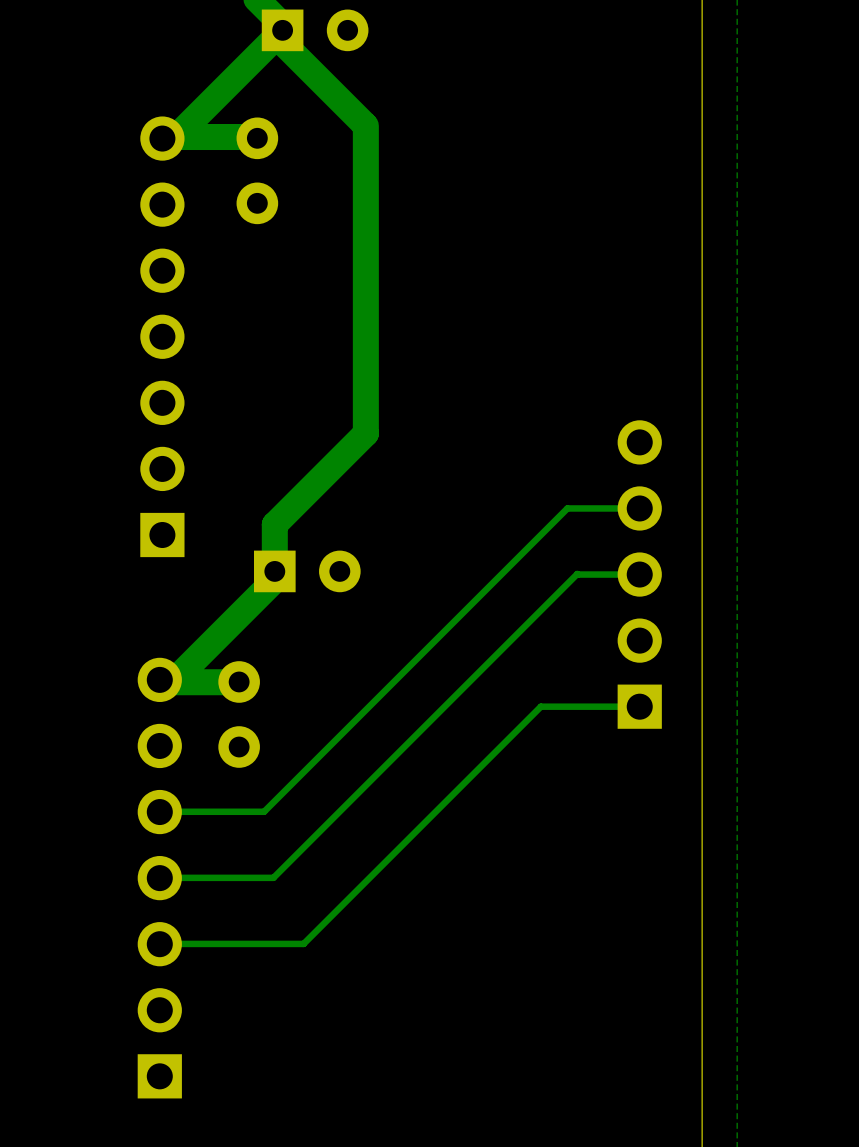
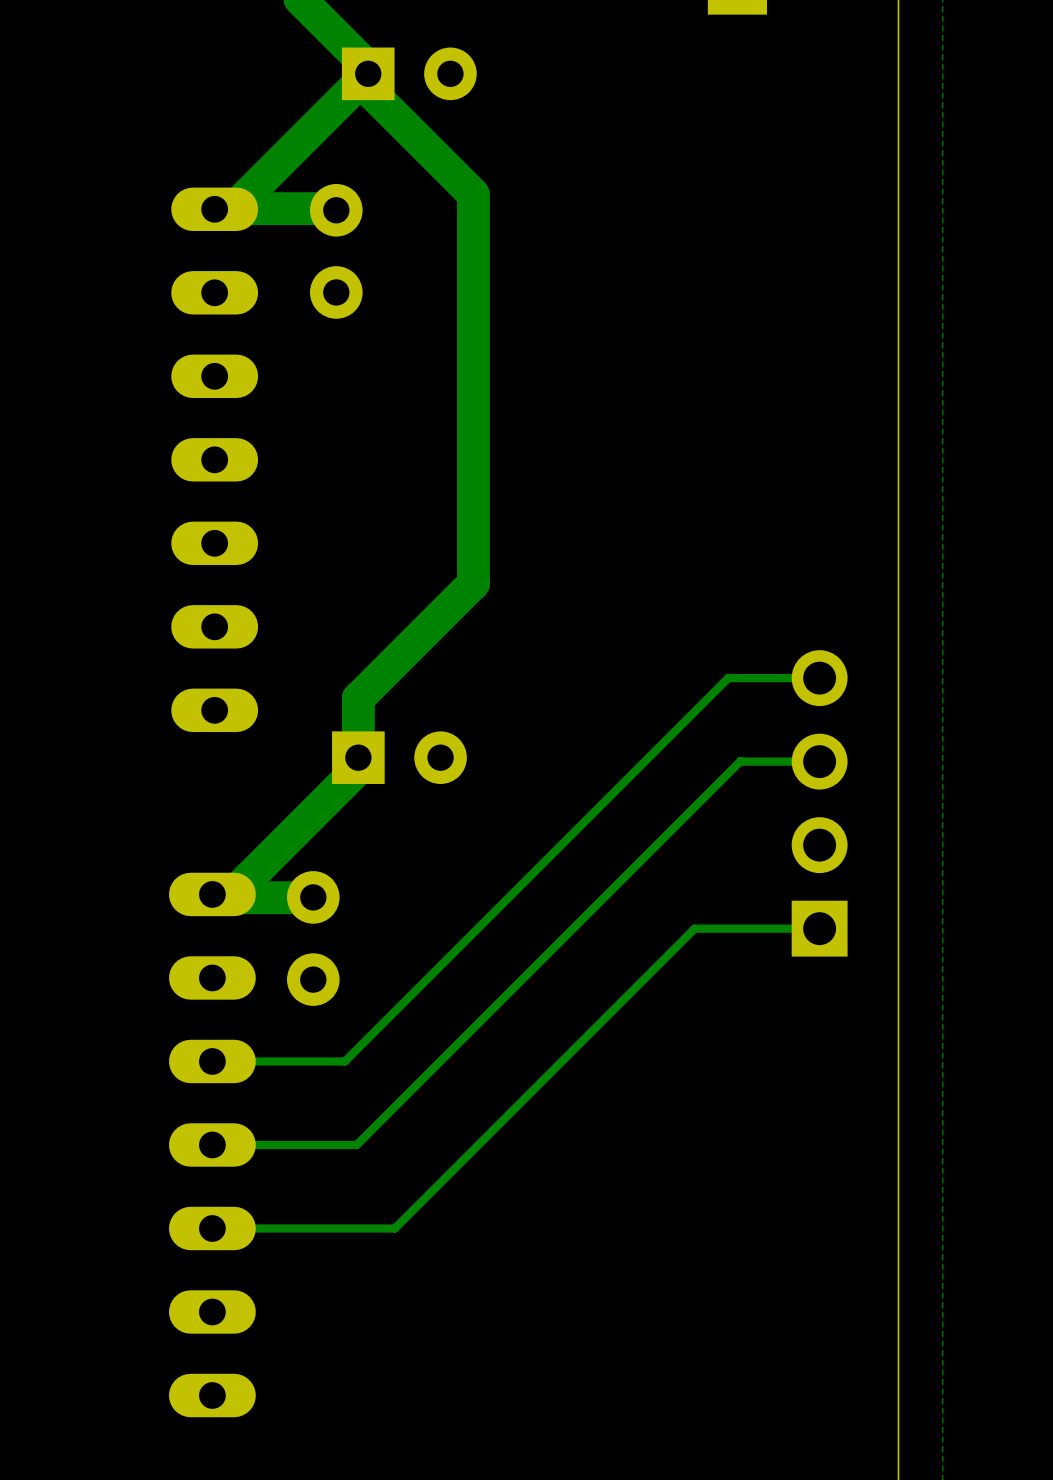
part footprint: [140, 116, 185, 558] -> [171, 187, 259, 733]
part: (639, 574) -> none
part footprint: [137, 657, 182, 1099] -> [168, 872, 256, 1418]

